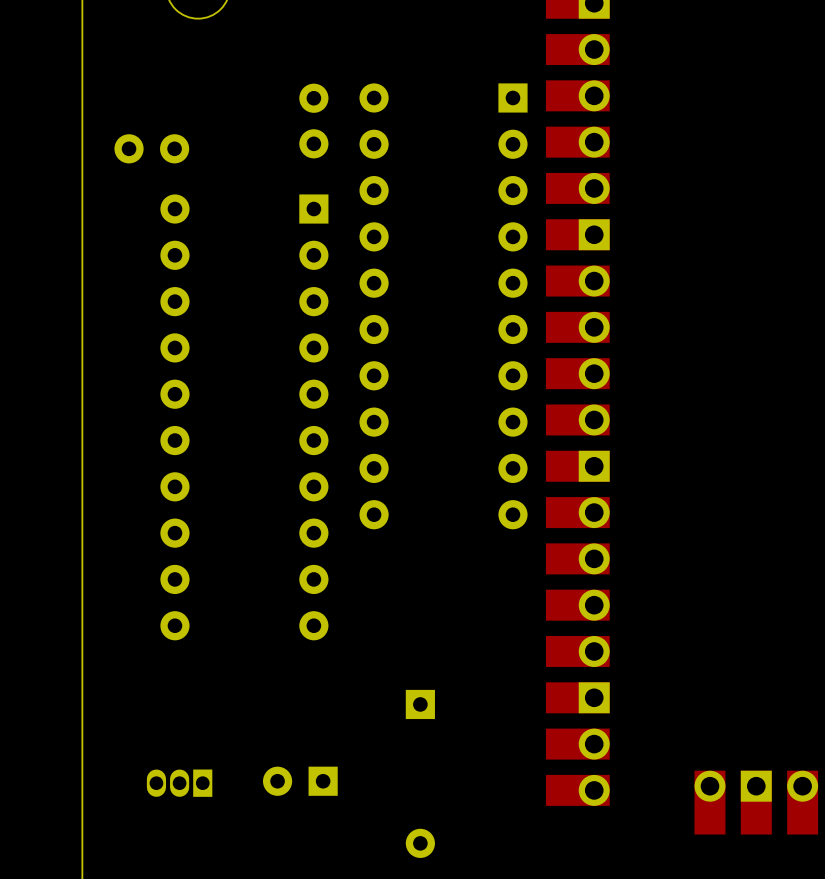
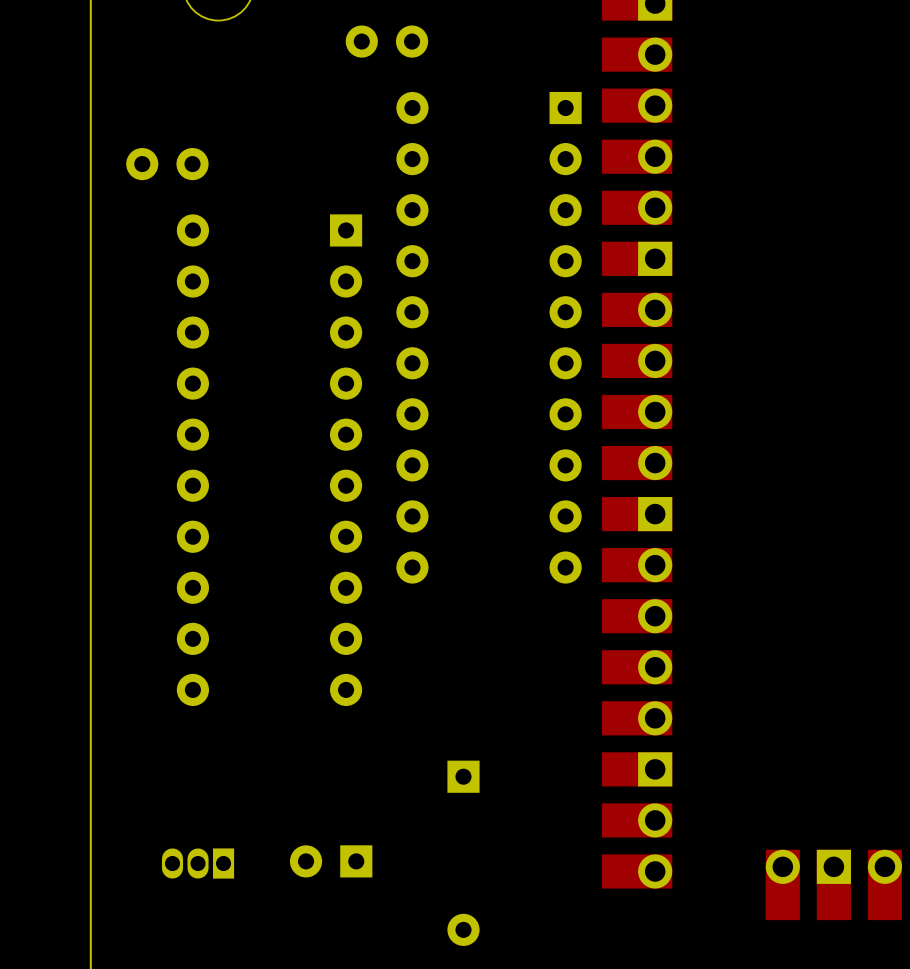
part rotation: 0° (313, 121) -> 90° clockwise (386, 41)
part position: (313, 121) -> (386, 41)

